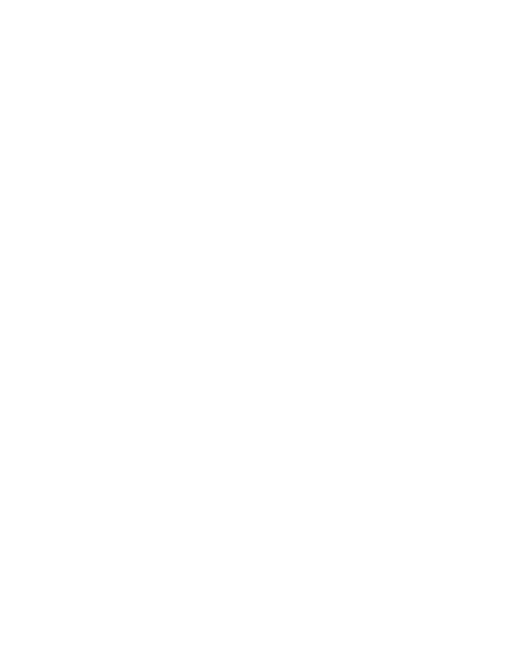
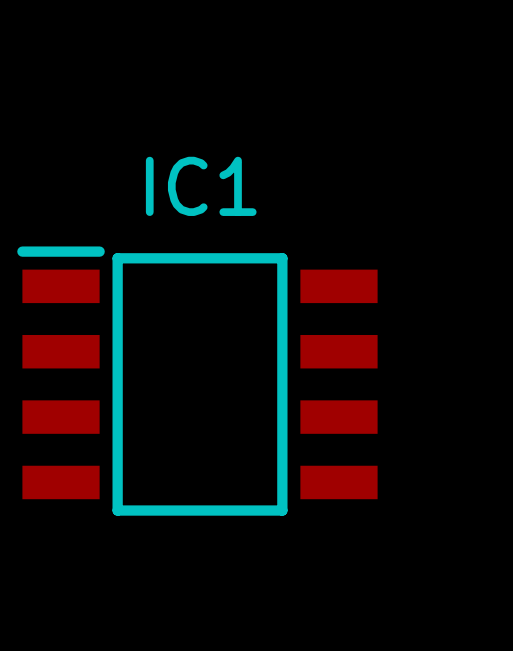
IC1: none -> (197, 381)

